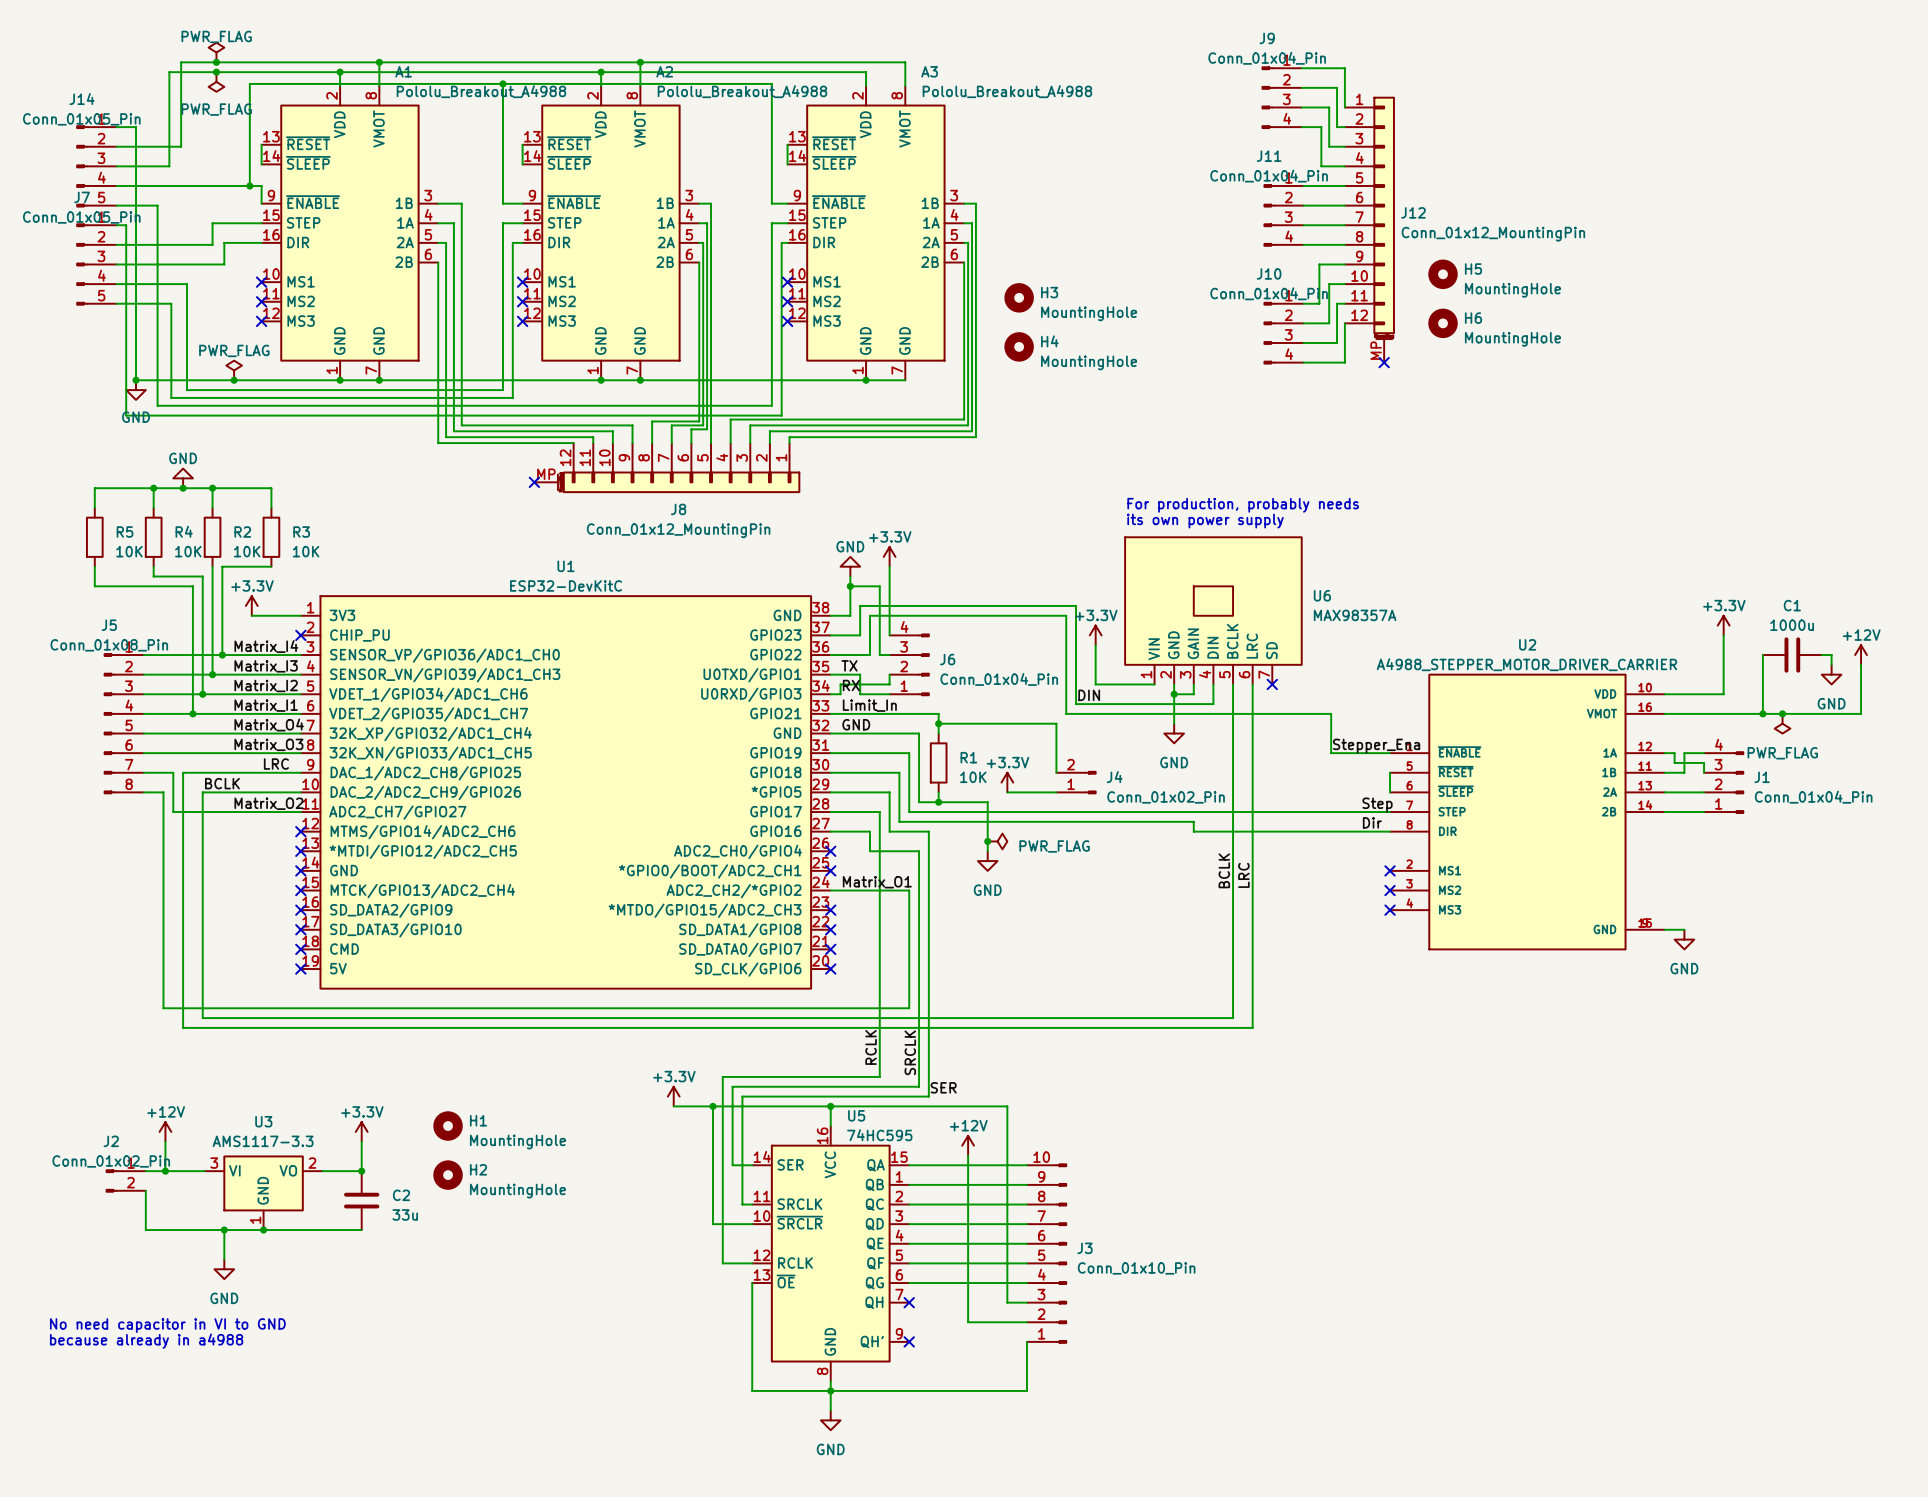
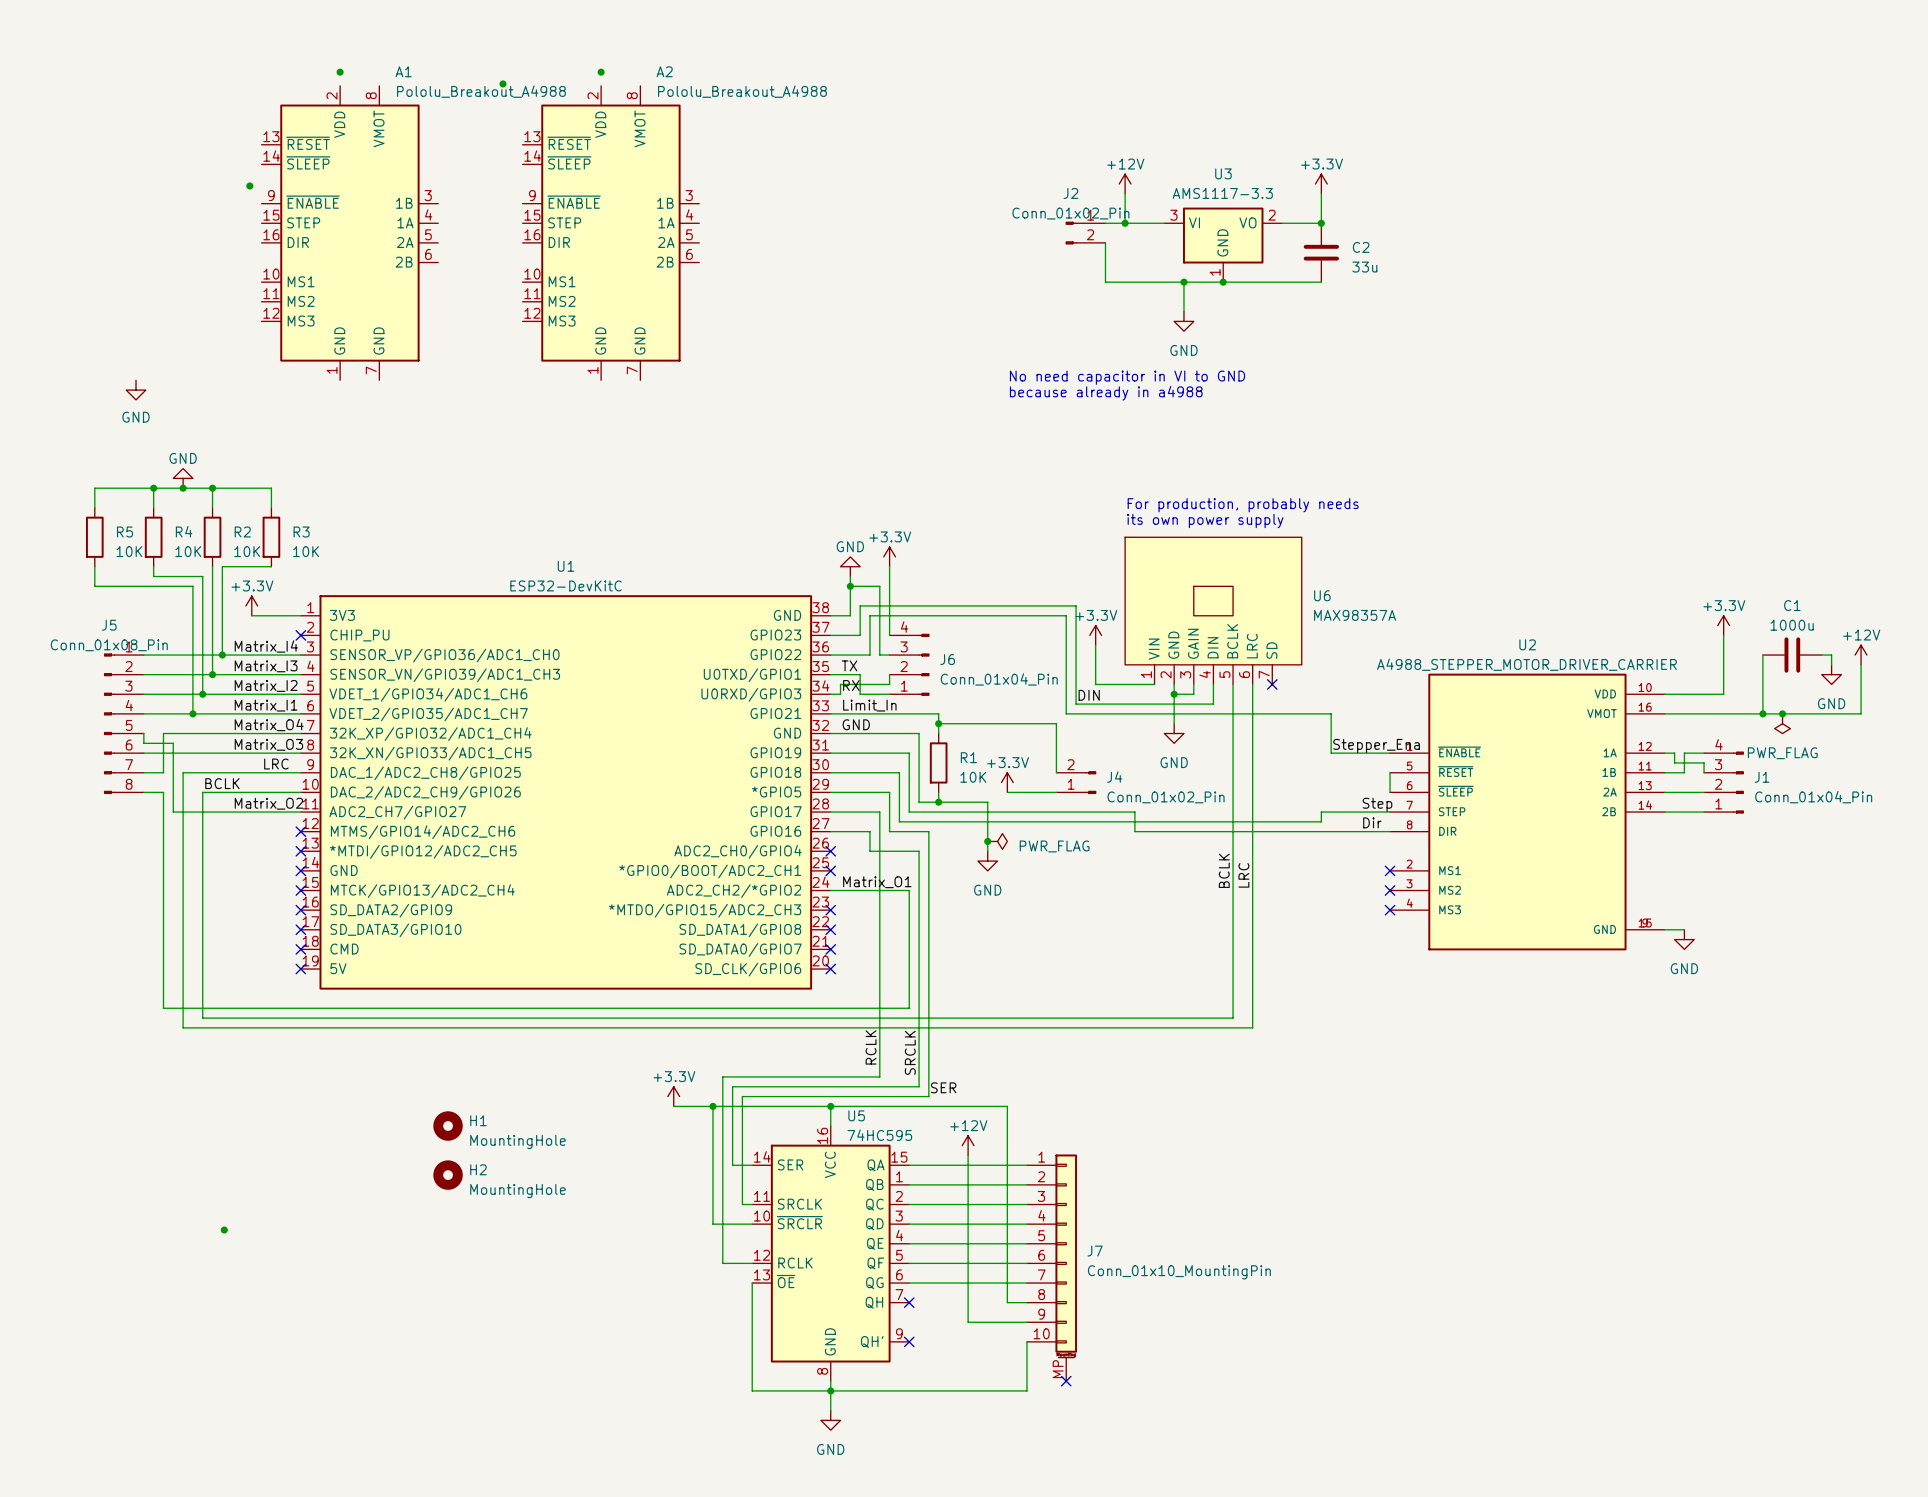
power symbol: PWR_FLAG (216, 52) -> none
junction: (216, 62) -> none
wire: (379, 62) (379, 85) -> none
junction: (379, 62) -> none
wire: (640, 62) (640, 85) -> none
junction: (640, 62) -> none
wire: (1301, 68) (1344, 68) (1344, 107) -> none
junction: (216, 72) -> none
wire: (340, 72) (340, 85) -> none
wire: (601, 72) (601, 85) -> none
power symbol: PWR_FLAG (216, 81) -> none
wire: (502, 83) (502, 203) (522, 203) -> none
wire: (866, 85) (866, 72) (169, 72) (169, 166) (116, 166) -> none
wire: (905, 85) (905, 62) (181, 62) (181, 146) (116, 146) -> none
wire: (1301, 87) (1337, 87) (1337, 127) (1344, 127) -> none
J9: Conn_01x04_Pin (1281, 97) -> none
wire: (1301, 107) (1329, 107) (1329, 146) (1344, 146) -> none
wire: (116, 127) (136, 127) (136, 380) (905, 380) -> none
wire: (1301, 127) (1321, 127) (1321, 166) (1344, 166) -> none
wire: (261, 144) (261, 164) -> none
wire: (522, 144) (522, 164) -> none
wire: (787, 144) (787, 164) -> none
J14: Conn_01x05_Pin (96, 166) -> none
power symbol: none -> +12V (1125, 184)
power symbol: none -> +3.3V (1321, 184)
wire: (116, 185) (261, 185) (261, 203) -> none
wire: (249, 185) (249, 83) (771, 83) (771, 203) (787, 203) -> none
wire: (1303, 185) (1344, 185) -> none
wire: none -> (1125, 193) (1125, 223)
wire: none -> (1321, 193) (1321, 223) (1282, 223)
J7 name position: J7 (82, 197) -> J7 (1095, 1251)
wire: (438, 203) (461, 203) (461, 425) (632, 425) (632, 443) -> none
wire: (699, 203) (711, 203) (711, 443) -> none
wire: (964, 203) (975, 203) (975, 437) (789, 437) (789, 443) -> none
wire: (116, 205) (157, 205) (157, 405) (771, 405) (771, 223) (787, 223) -> none
wire: (1303, 205) (1344, 205) -> none
J11: Conn_01x04_Pin (1283, 215) -> none
J7 value: Conn_01x05_Pin (81, 217) -> Conn_01x10_MountingPin (1179, 1272)
J7 symbol: [76, 223, 117, 306] -> [1026, 1154, 1078, 1382]
wire: (261, 223) (212, 223) (212, 244) (116, 244) -> none
wire: (438, 223) (453, 223) (453, 431) (612, 431) (612, 443) -> none
wire: (522, 223) (502, 223) (502, 390) (187, 390) (187, 284) (116, 284) -> none
wire: (699, 223) (707, 223) (707, 429) (691, 429) (691, 443) -> none
wire: (964, 223) (972, 223) (972, 431) (769, 431) (769, 443) -> none
wire: none -> (1105, 223) (1164, 223)
junction: none -> (1125, 223)
junction: none -> (1321, 223)
wire: (116, 225) (126, 225) (126, 415) (781, 415) (781, 242) (787, 242) -> none
wire: (1303, 225) (1344, 225) -> none
J12: Conn_01x12_MountingPin (1369, 229) -> none
A3: Pololu_Breakout_A4988 (875, 233) -> none
wire: (261, 242) (224, 242) (224, 264) (116, 264) -> none
wire: (438, 242) (446, 242) (446, 437) (593, 437) (593, 443) -> none
wire: (522, 242) (512, 242) (512, 397) (171, 397) (171, 303) (116, 303) -> none
wire: (699, 242) (703, 242) (703, 425) (671, 425) (671, 443) -> none
wire: (964, 242) (968, 242) (968, 425) (750, 425) (750, 443) -> none
wire: none -> (1105, 242) (1105, 282) (1321, 282)
wire: (1303, 244) (1344, 244) -> none
wire: (438, 262) (438, 443) (573, 443) -> none
wire: (699, 262) (699, 421) (652, 421) (652, 443) -> none
wire: (964, 262) (964, 419) (730, 419) (730, 443) -> none
wire: (1344, 264) (1319, 264) (1319, 303) (1303, 303) -> none
H5: MountingHole (1443, 274) -> none
no-connect mark: (261, 282) -> none
no-connect mark: (522, 282) -> none
no-connect mark: (787, 282) -> none
wire: none -> (1183, 282) (1183, 311)
junction: none -> (1183, 282)
junction: none -> (1223, 282)
wire: (1344, 284) (1329, 284) (1329, 323) (1303, 323) -> none
H3: MountingHole (1019, 297) -> none
no-connect mark: (261, 301) -> none
no-connect mark: (522, 301) -> none
no-connect mark: (787, 301) -> none
wire: (1344, 303) (1337, 303) (1337, 342) (1303, 342) -> none
no-connect mark: (261, 321) -> none
no-connect mark: (522, 321) -> none
no-connect mark: (787, 321) -> none
power symbol: none -> GND (1183, 321)
wire: (1344, 323) (1344, 362) (1303, 362) -> none
H6: MountingHole (1443, 323) -> none
J10: Conn_01x04_Pin (1283, 333) -> none
H4: MountingHole (1019, 346) -> none
no-connect mark: (1384, 362) -> none
power symbol: PWR_FLAG (234, 370) -> none
text: none -> No need capacitor in VI to GND (1127, 377)
junction: (136, 380) -> none
junction: (234, 380) -> none
junction: (340, 380) -> none
junction: (379, 380) -> none
junction: (601, 380) -> none
junction: (640, 380) -> none
junction: (866, 380) -> none
text: none -> because already in a4988 (1106, 393)
J8: Conn_01x12_MountingPin (667, 468) -> none
no-connect mark: (534, 482) -> none
wire: (143, 733) (163, 733) -> (143, 733) (143, 743) (173, 743) (173, 772)
wire: (163, 772) (173, 772) -> (163, 772) (163, 733)
wire: (1134, 812) (1321, 812) -> (1193, 821) (1321, 821) (1321, 812)
wire: (1193, 821) (1193, 831) -> (1134, 812) (1134, 831) (1193, 831)
power symbol: +12V (165, 1131) -> none
power symbol: +3.3V (361, 1131) -> none
wire: (165, 1141) (165, 1171) -> none
wire: (361, 1141) (361, 1171) (322, 1171) -> none
wire: (145, 1171) (204, 1171) -> none
junction: (165, 1171) -> none
junction: (361, 1171) -> none
J2 position: (125, 1180) -> (1085, 233)
wire: (145, 1190) (145, 1230) (361, 1230) -> none
U3 position: (263, 1192) -> (1223, 244)
C2 position: (361, 1200) -> (1321, 252)
wire: (224, 1230) (224, 1259) -> none
junction: (263, 1230) -> none
J3: Conn_01x10_Pin (1046, 1253) -> none
power symbol: GND (224, 1269) -> none
text: No need capacitor in VI to GND (167, 1325) -> none
text: because already in a4988 (146, 1341) -> none
no-connect mark: none -> (1066, 1381)

